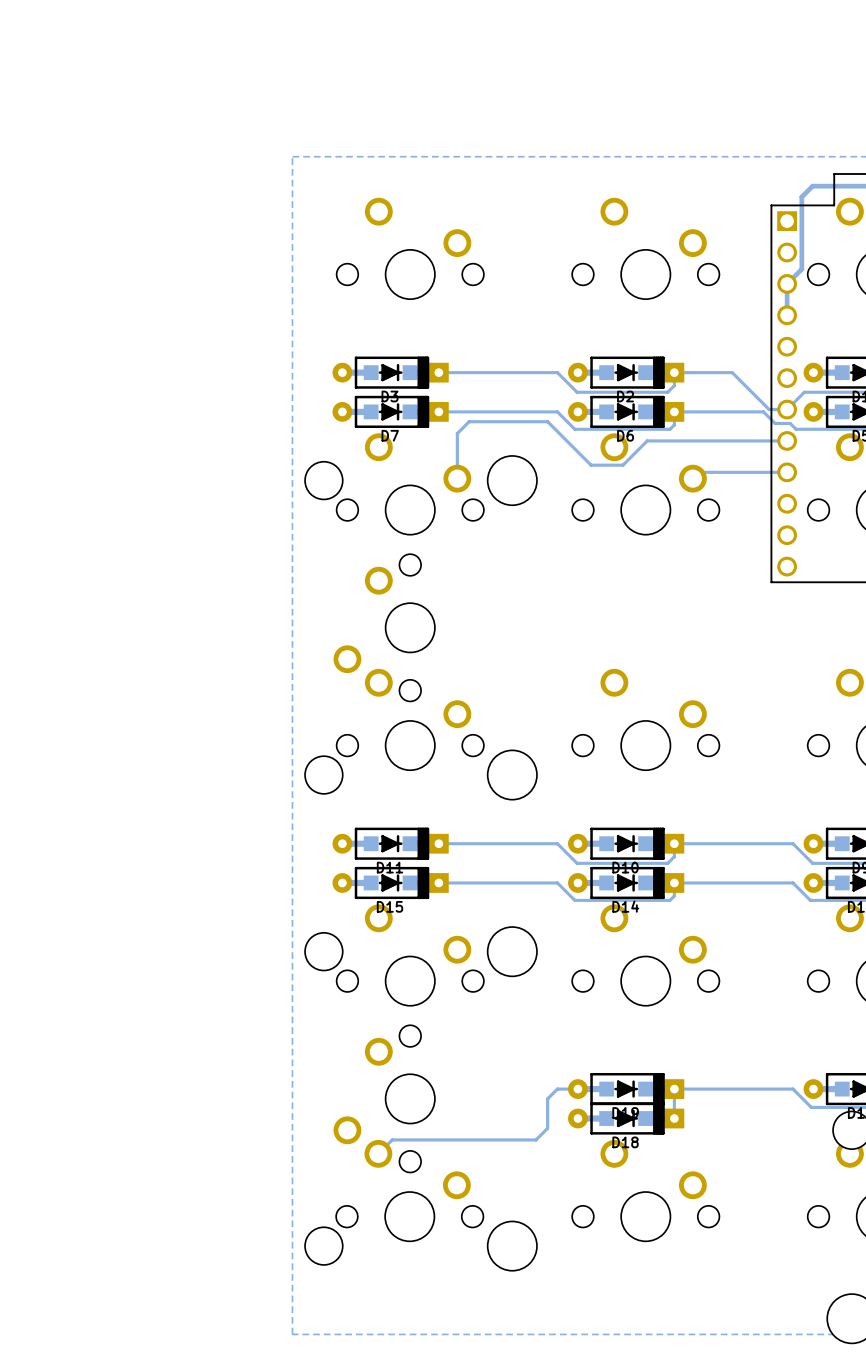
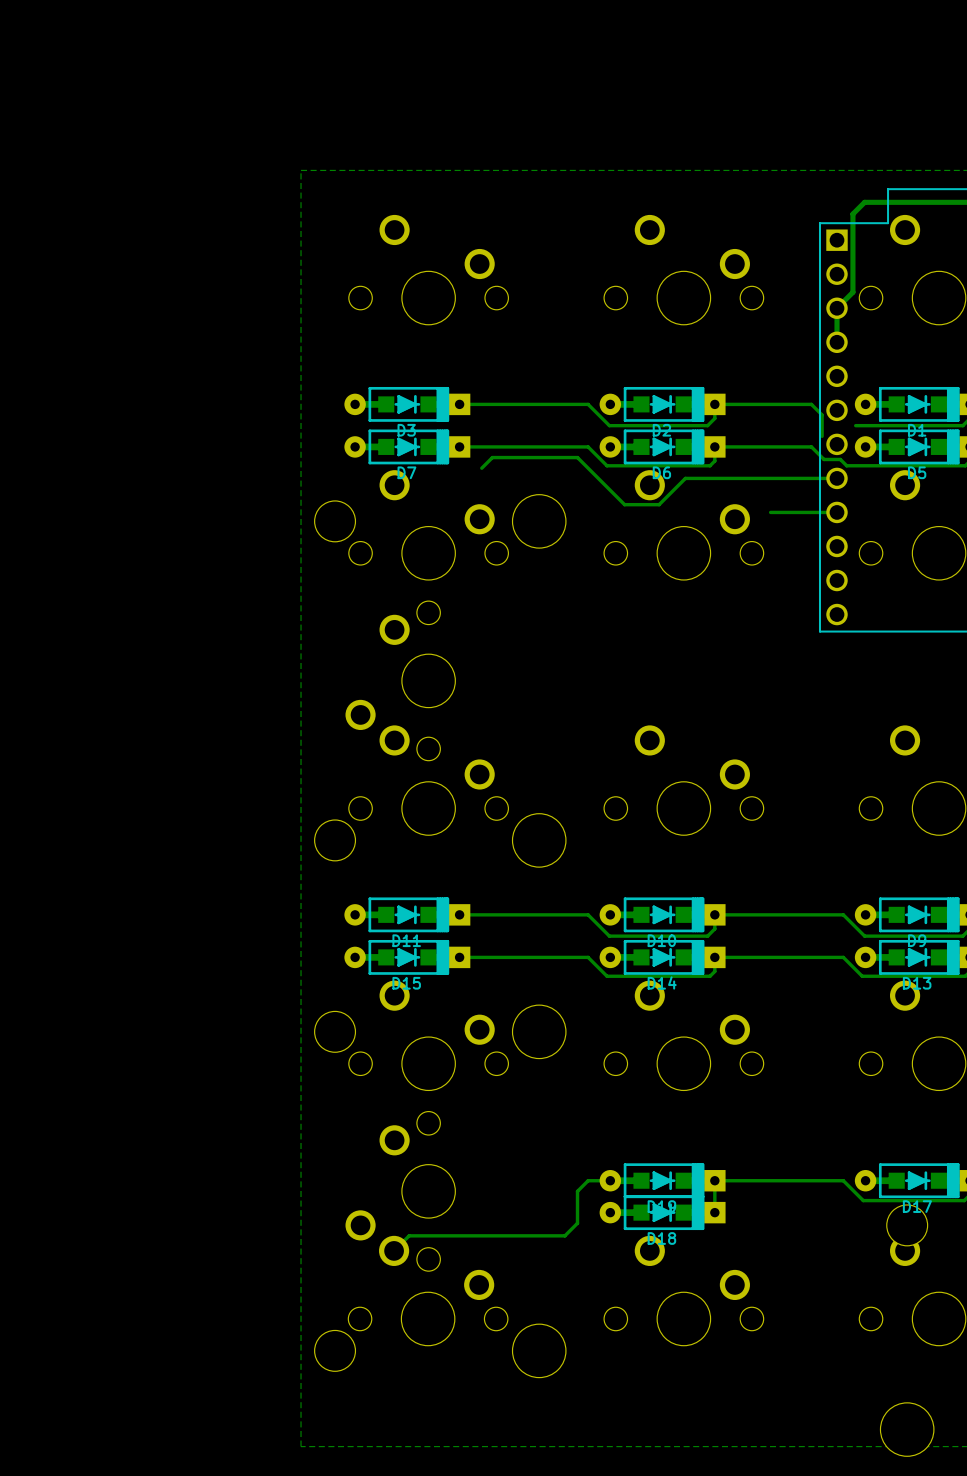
track: (732, 372) (769, 409) (787, 409) (804, 392) -> (777, 404) (811, 404) (822, 415) (822, 436)
track: (459, 431) (457, 433) (457, 478) -> none
track: (725, 472) (699, 472) (692, 478) -> none

